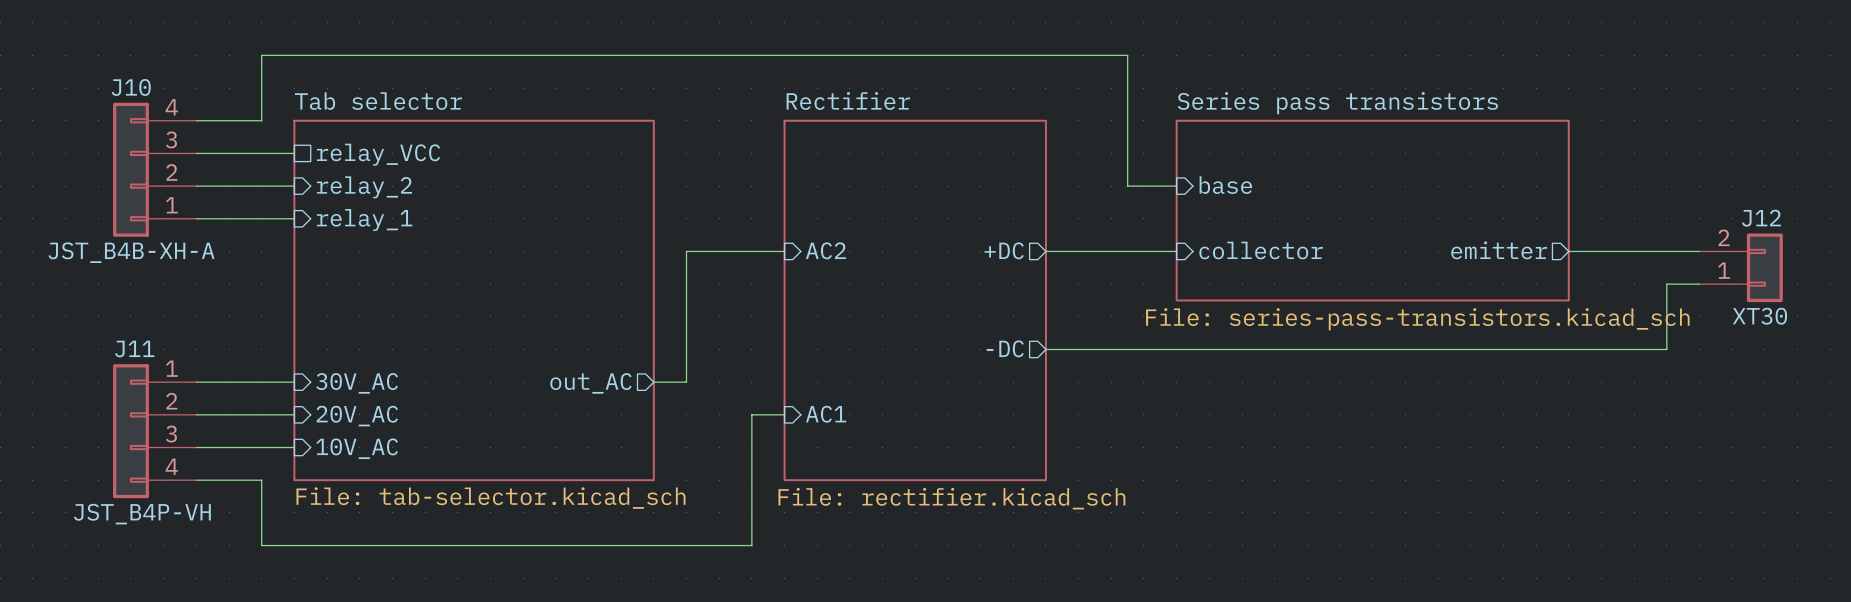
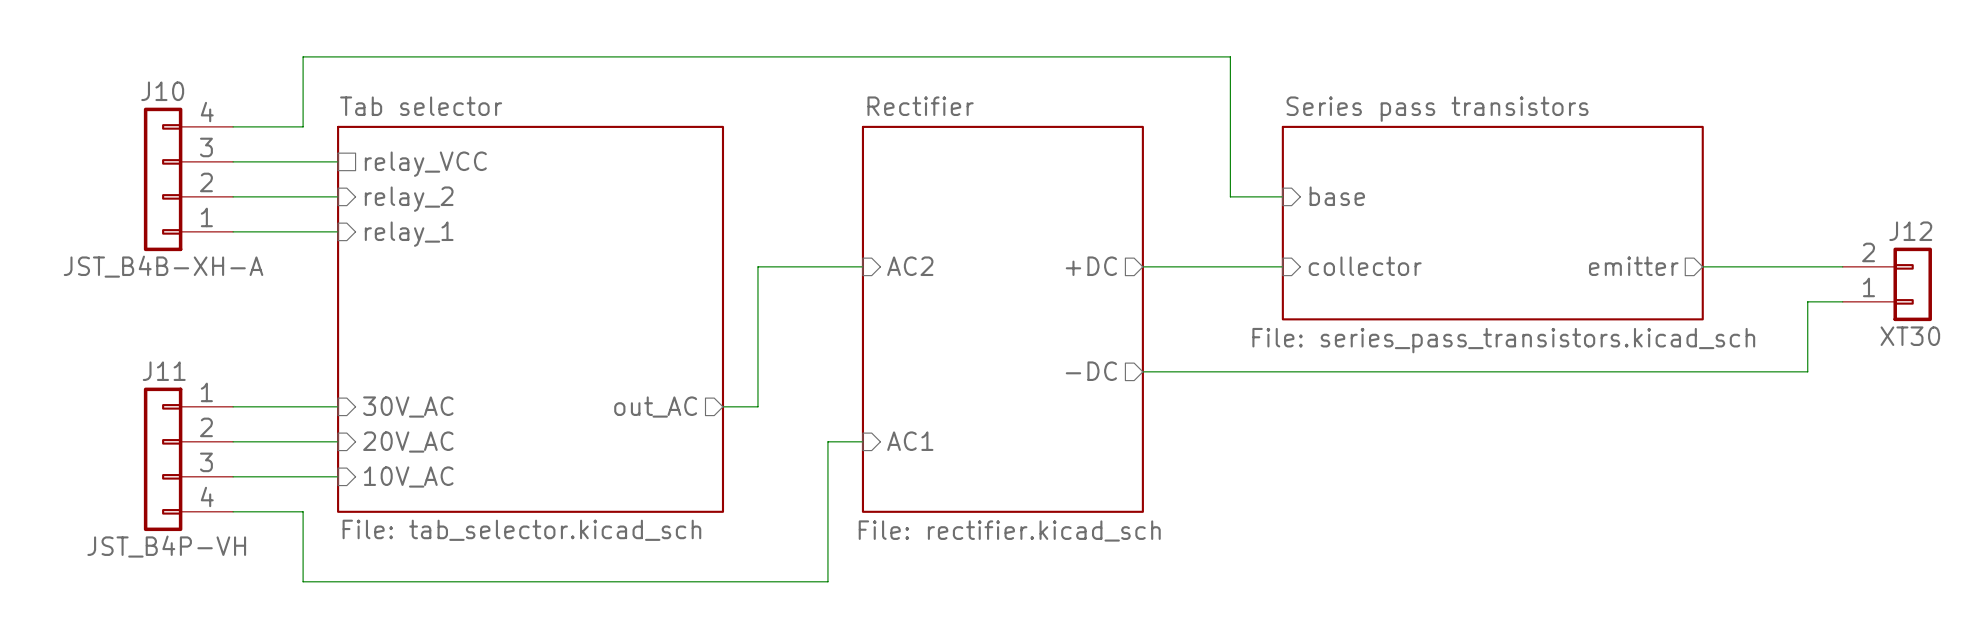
sheet Series pass transistors value: File: series-pass-transistors.kicad_sch (1417, 319) -> File: series_pass_transistors.kicad_sch (1503, 340)
sheet Tab selector value: File: tab-selector.kicad_sch (490, 498) -> File: tab_selector.kicad_sch (521, 530)

